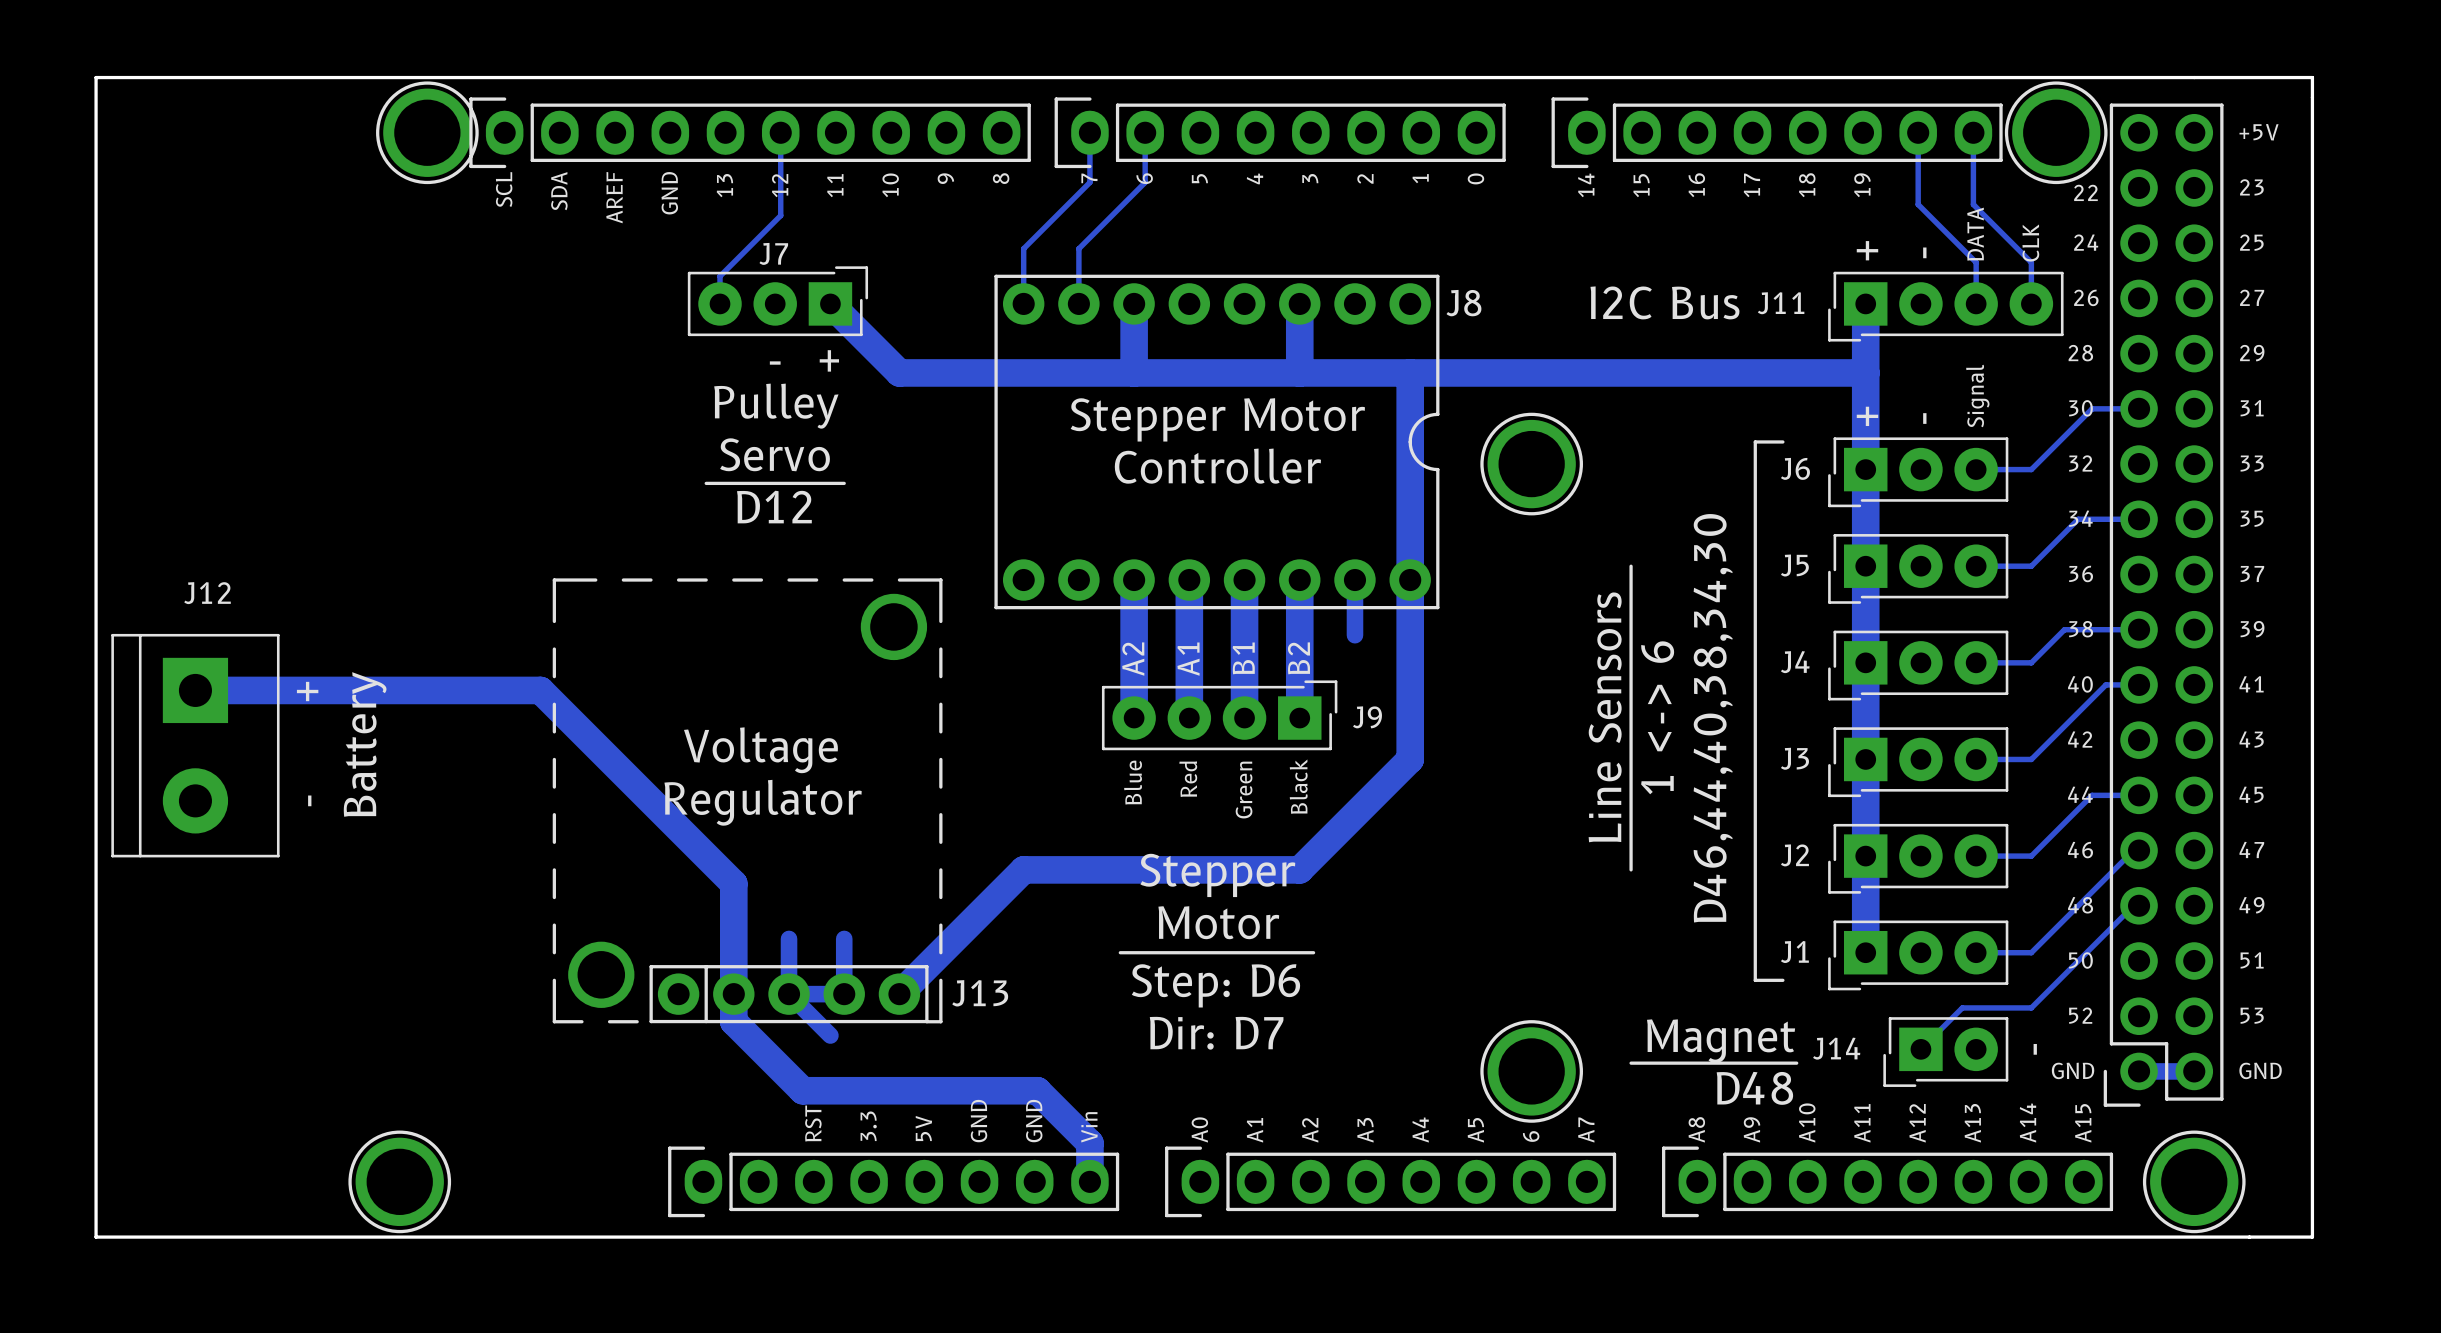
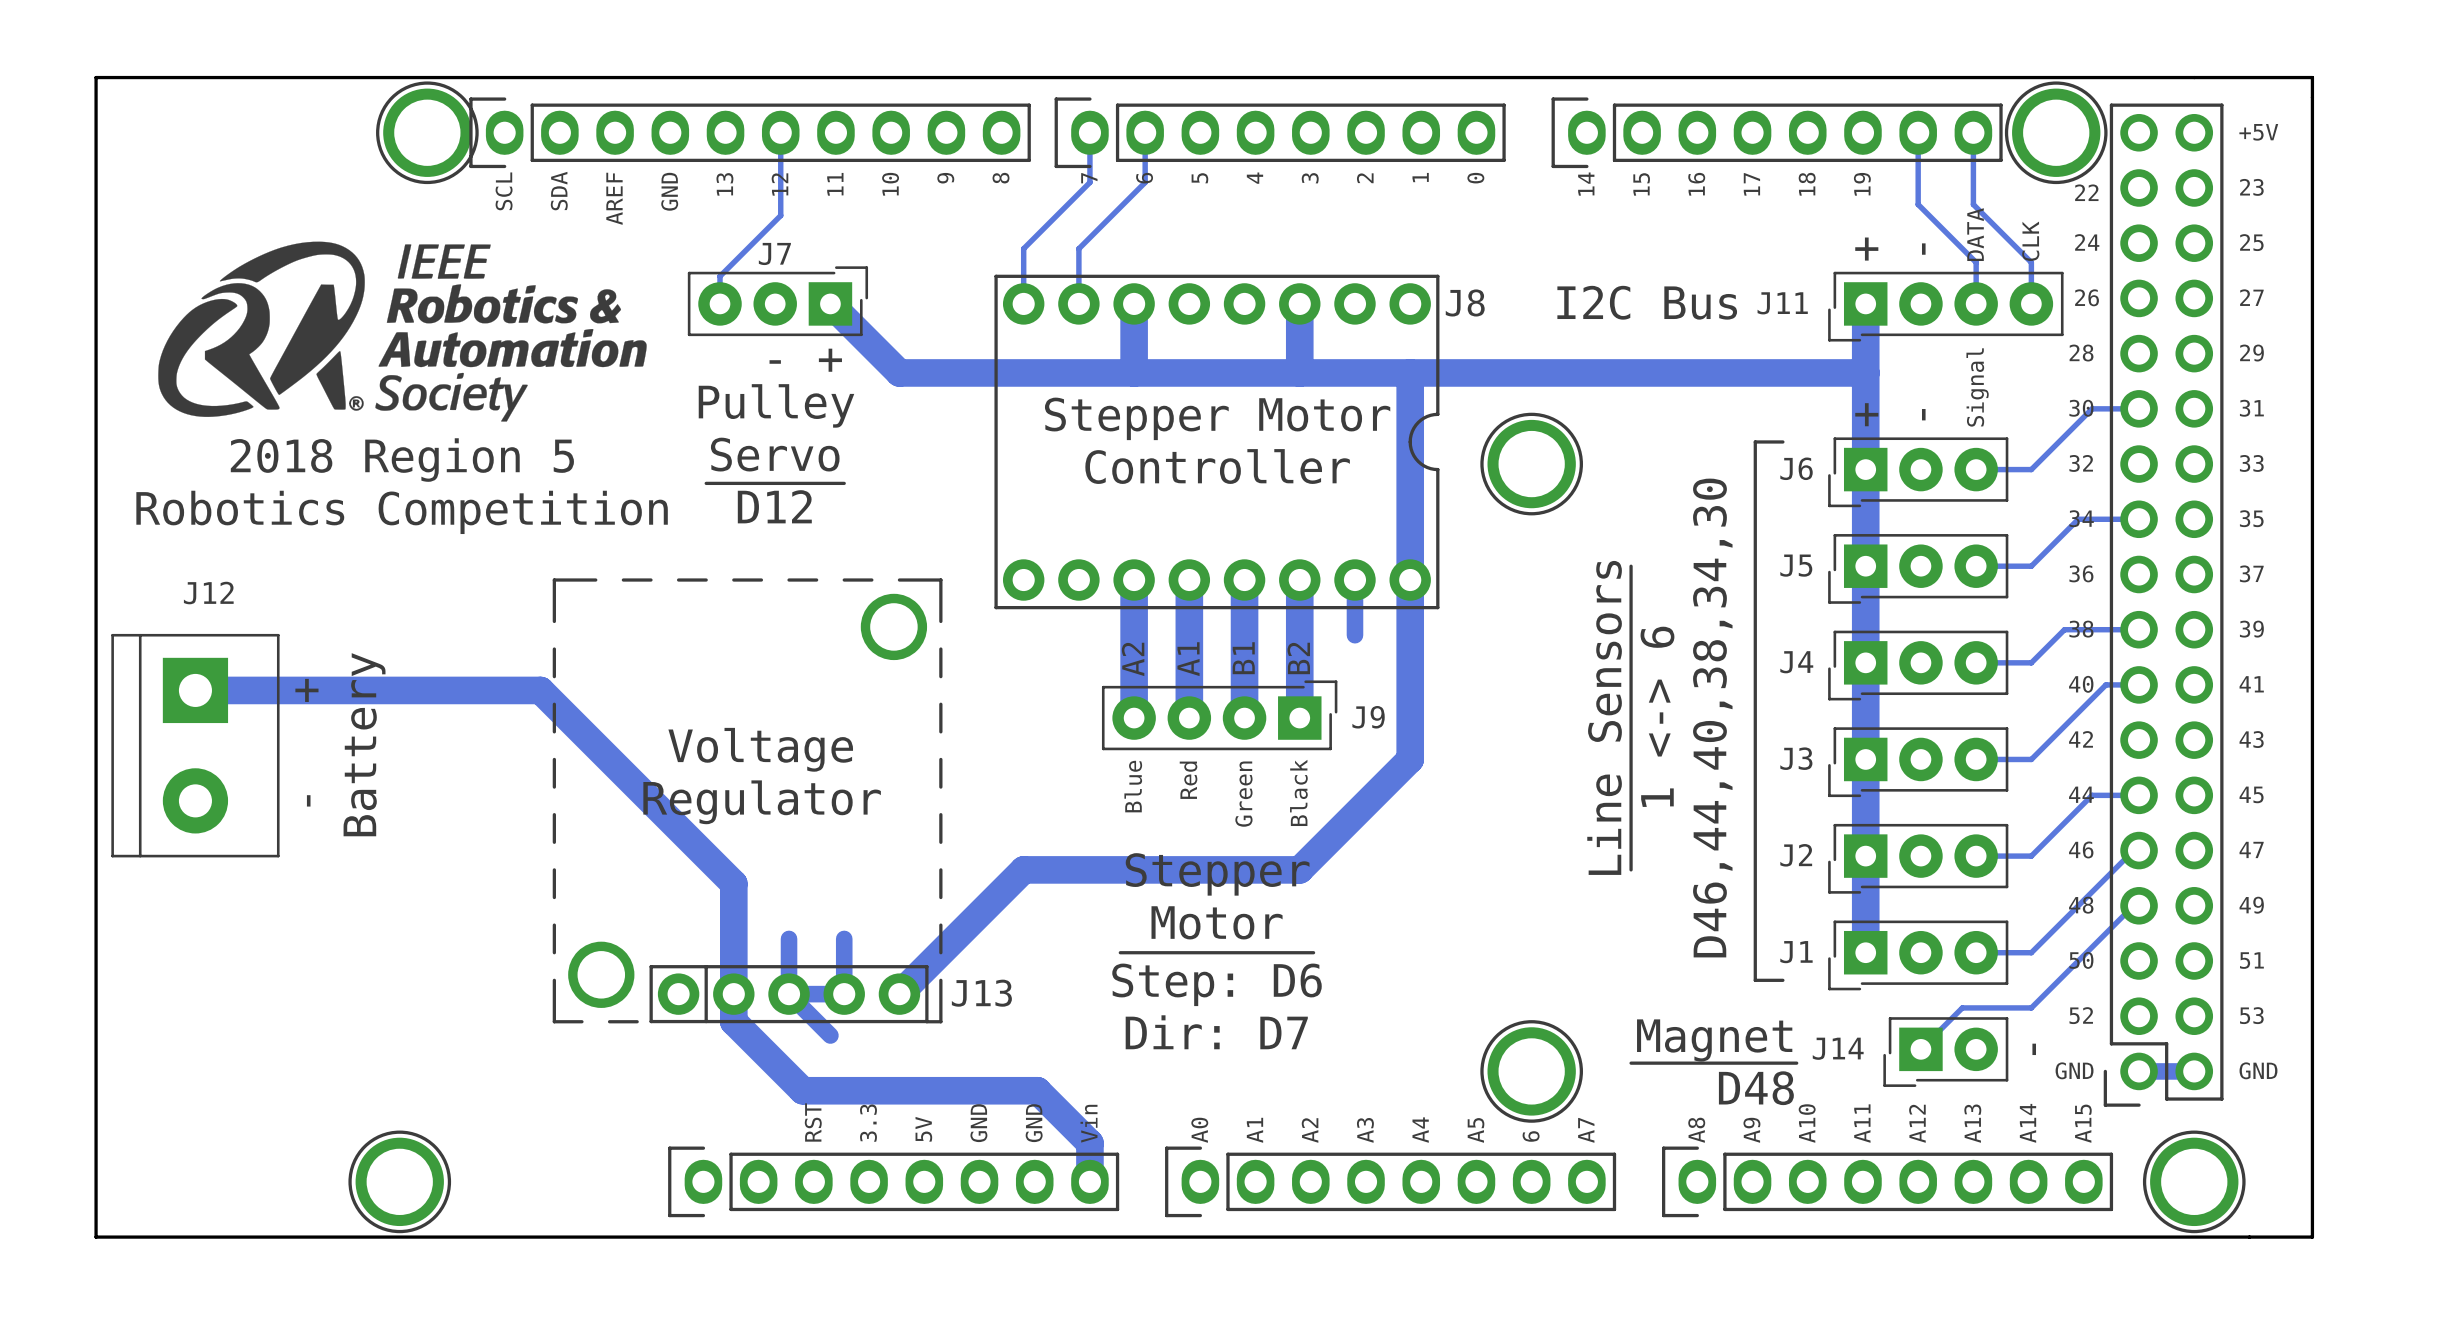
drawing: none -> [158, 241, 647, 422]
text: none -> 2018 Region 5 (402, 460)
text: none -> Robotics Competition (402, 512)

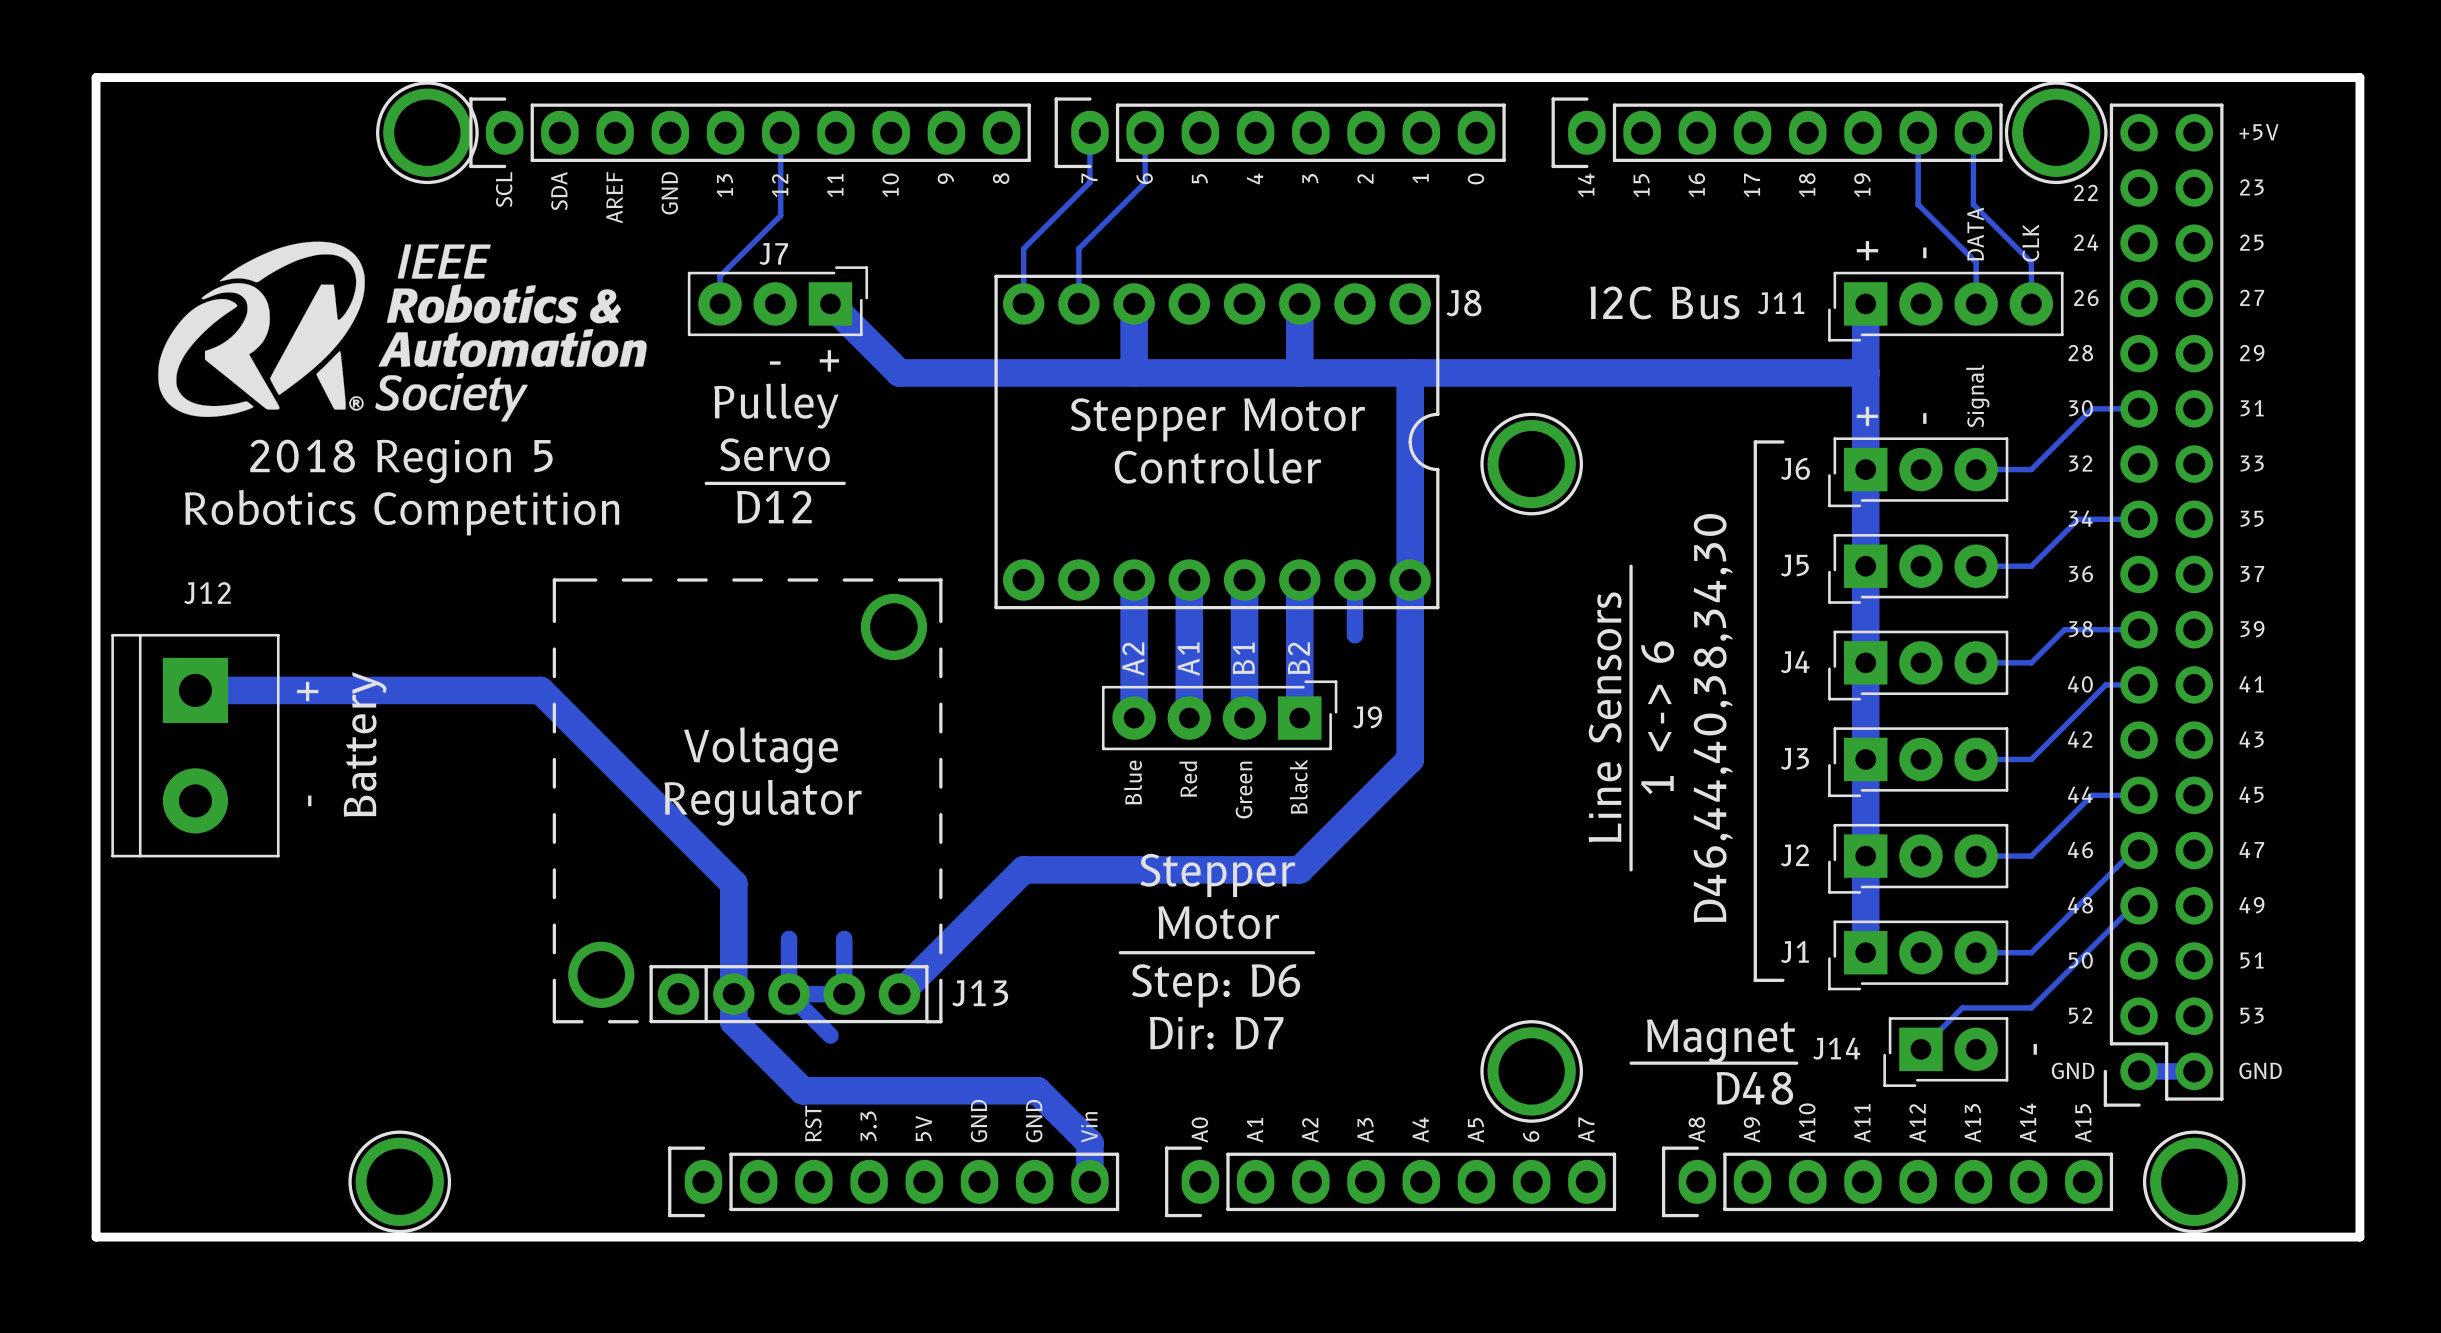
board edge: (2312, 77) (2312, 1237) -> (2312, 77) (2359, 77) (2359, 1237) (2312, 1237)
board edge width: thin (2312, 77) (96, 77) (96, 1237) (2312, 1237) -> thick (2312, 77) (96, 77) (96, 1237) (2312, 1237)

